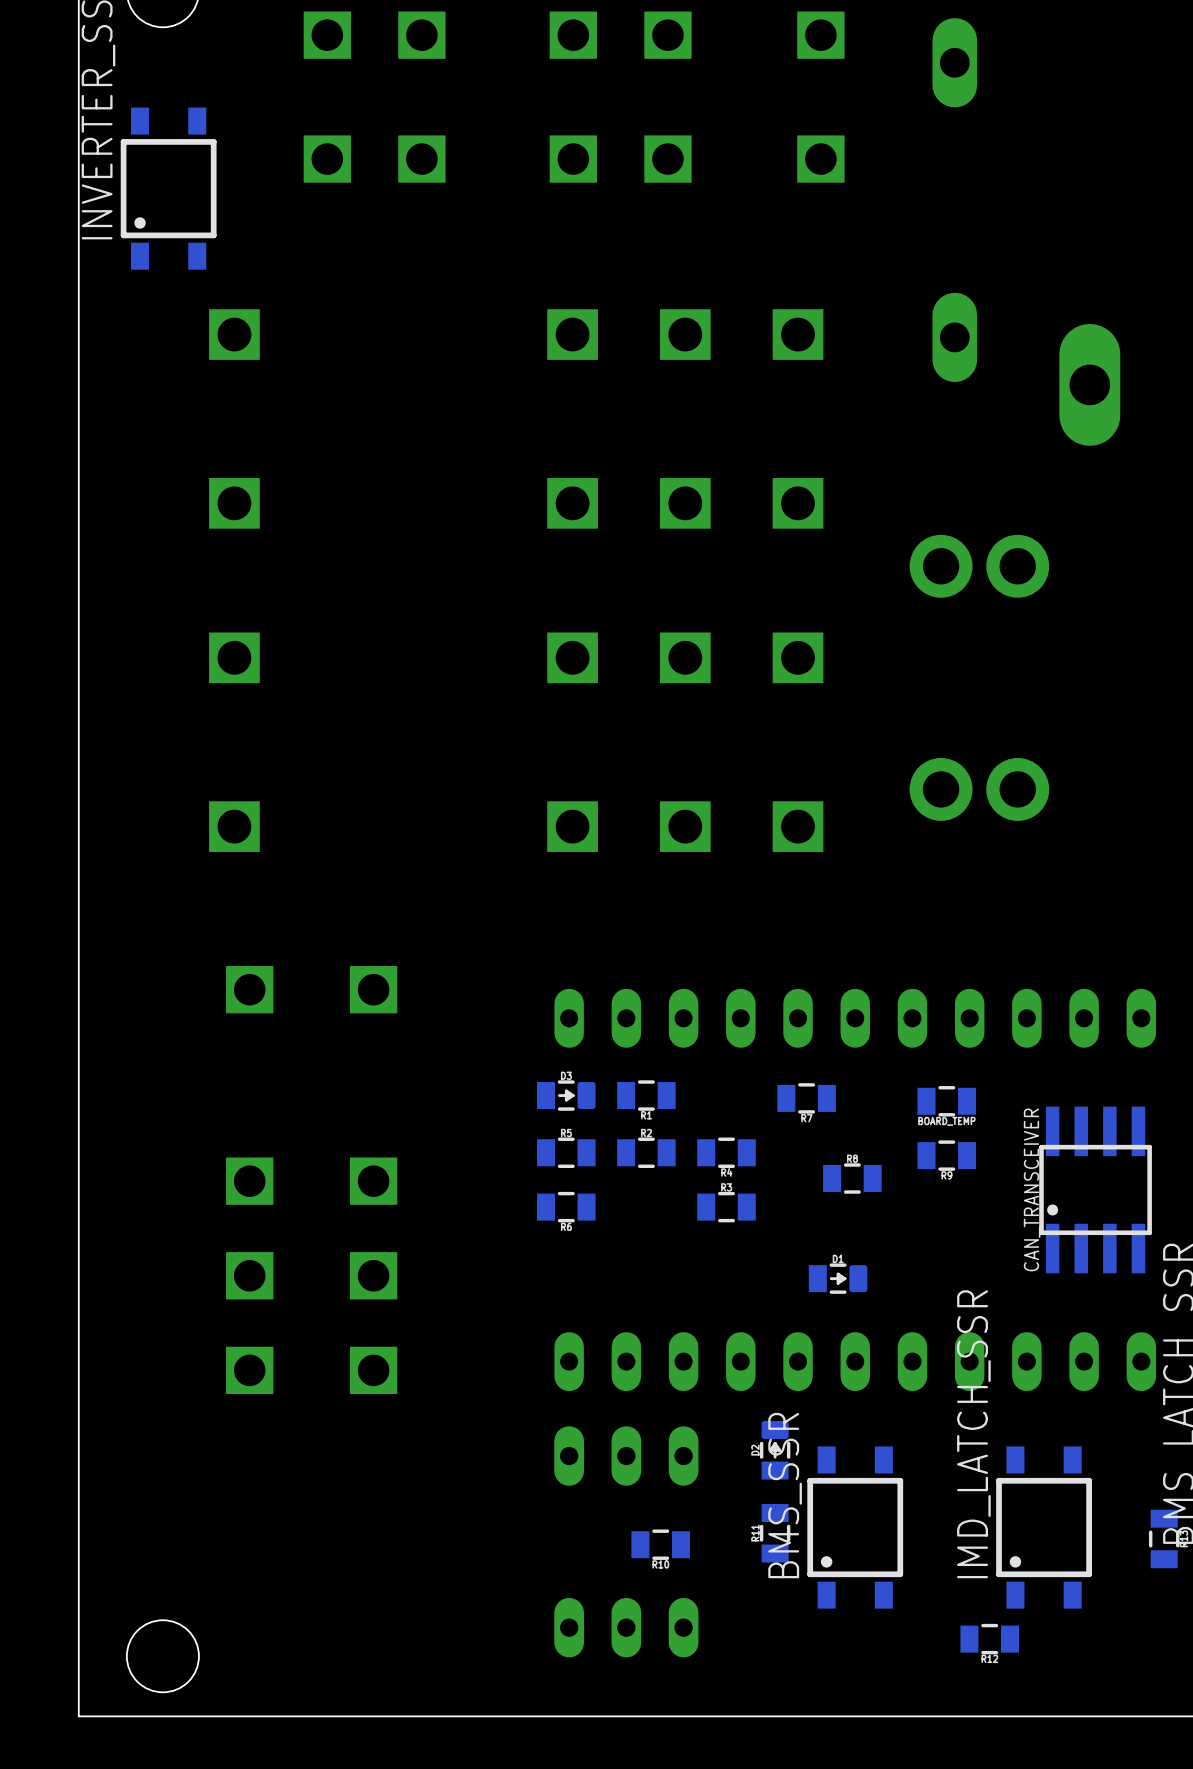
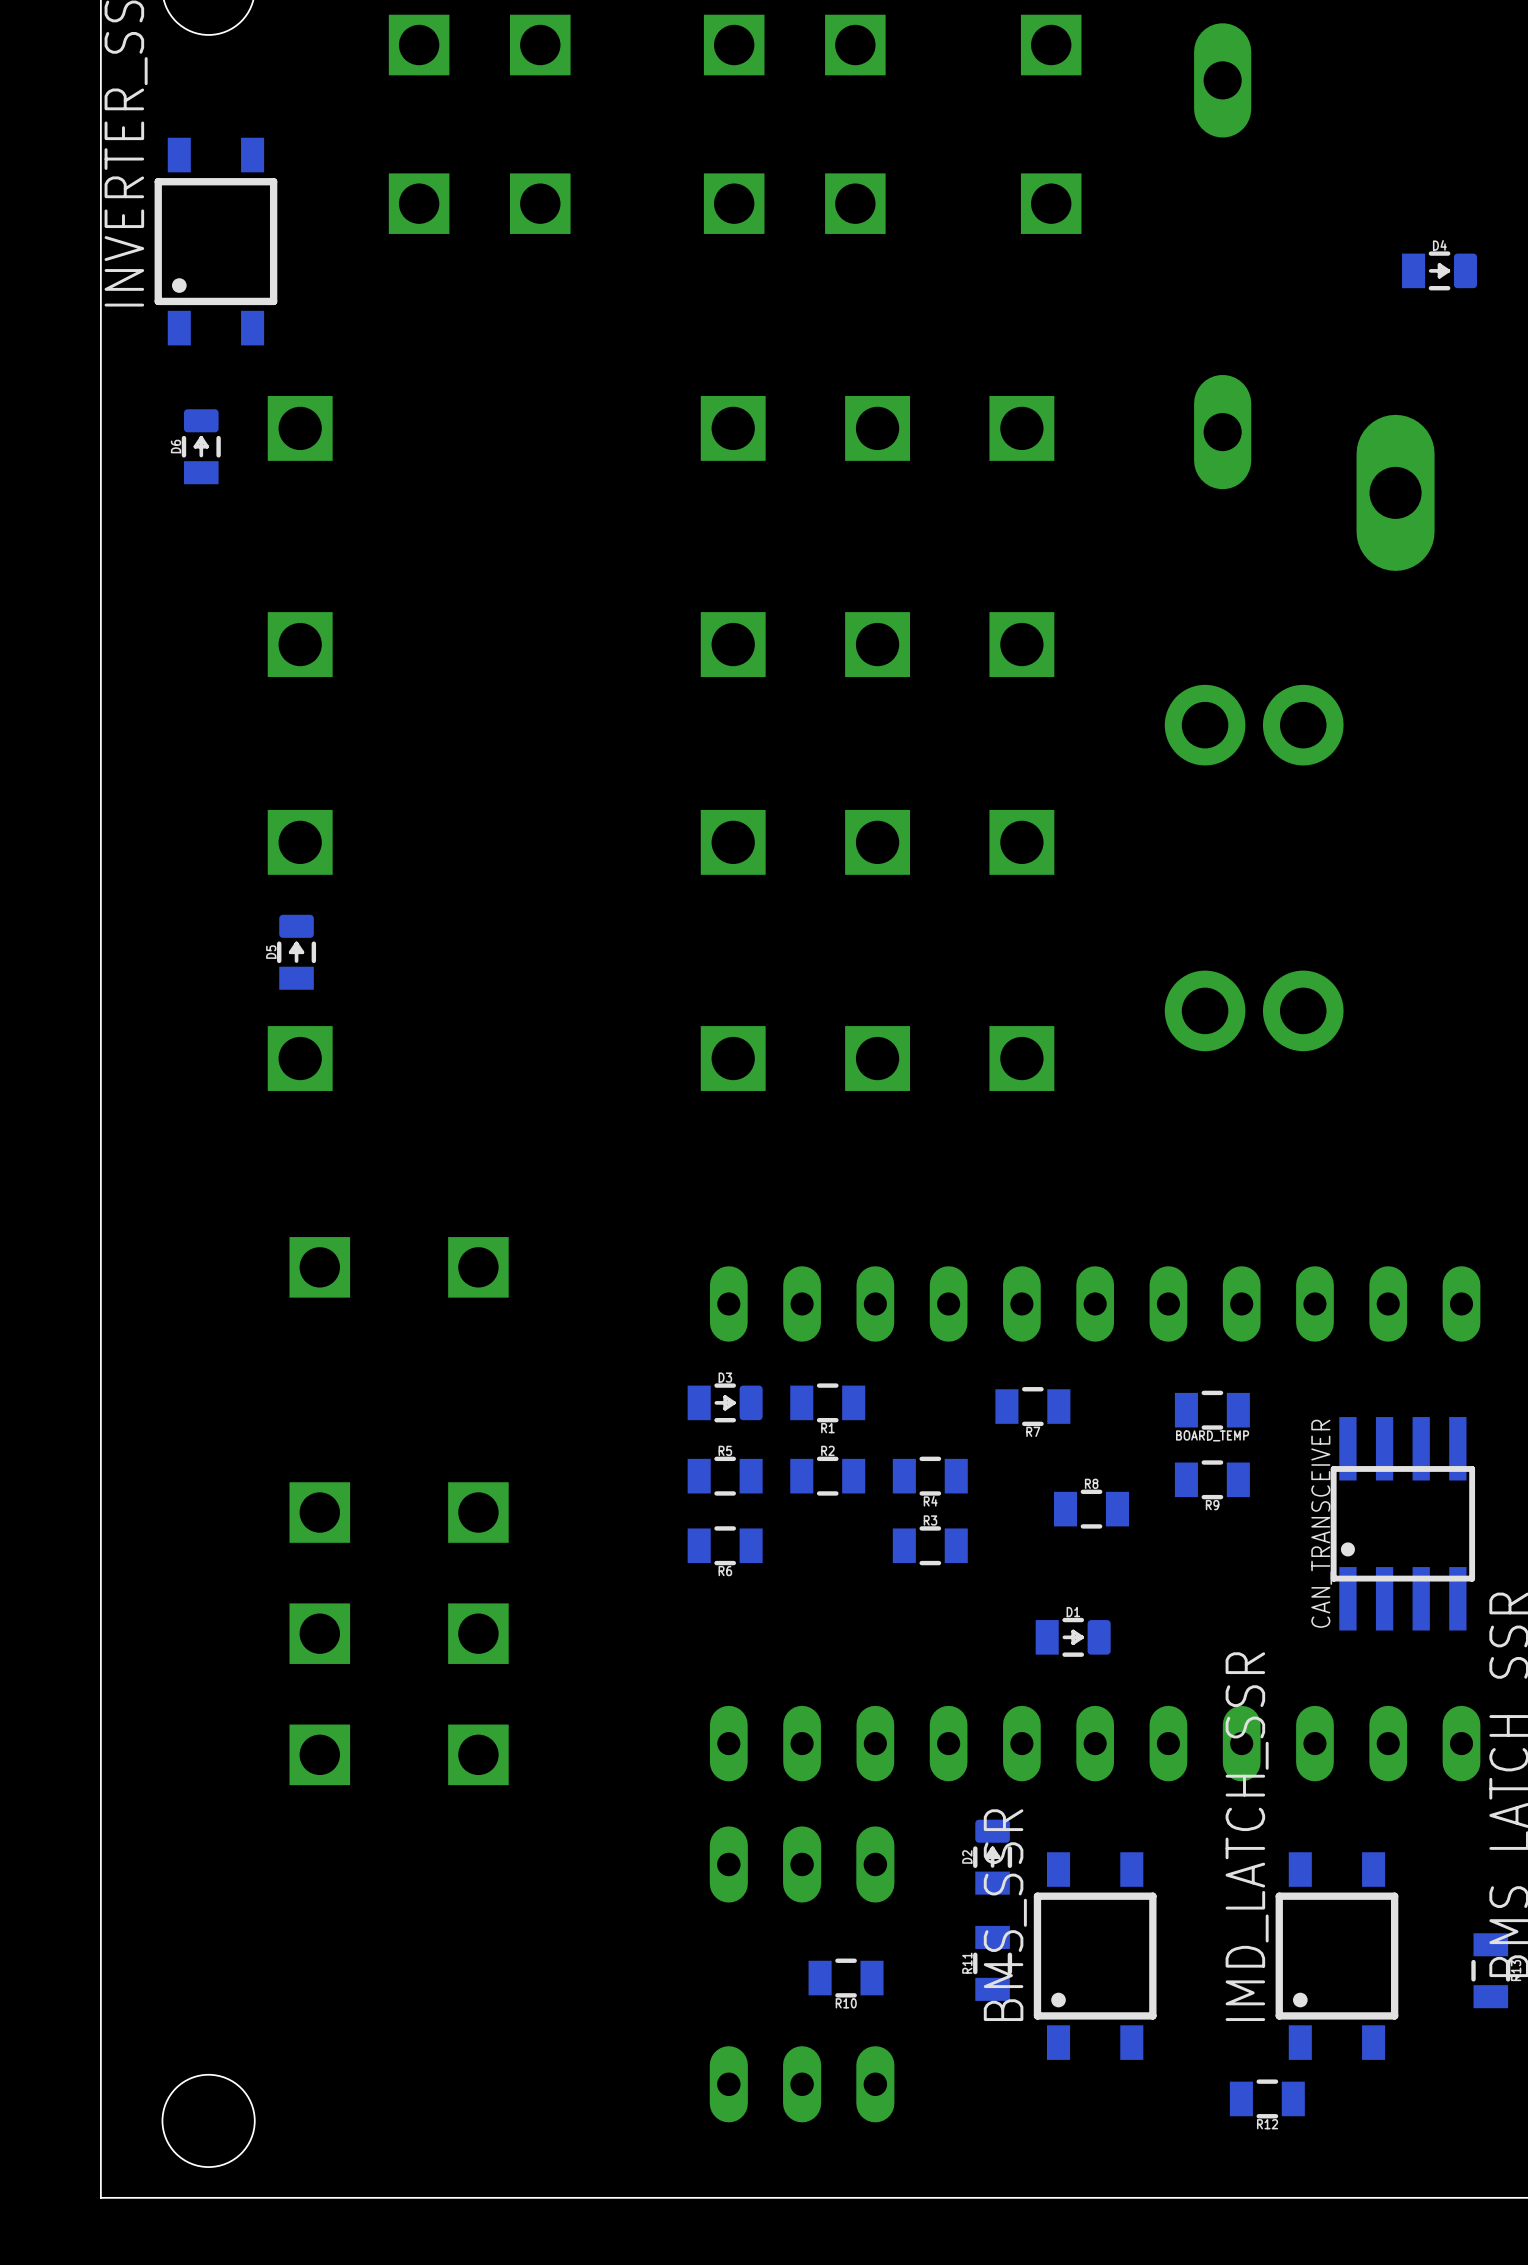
D4: none -> (1439, 270)
D6: none -> (201, 446)
D5: none -> (296, 952)

